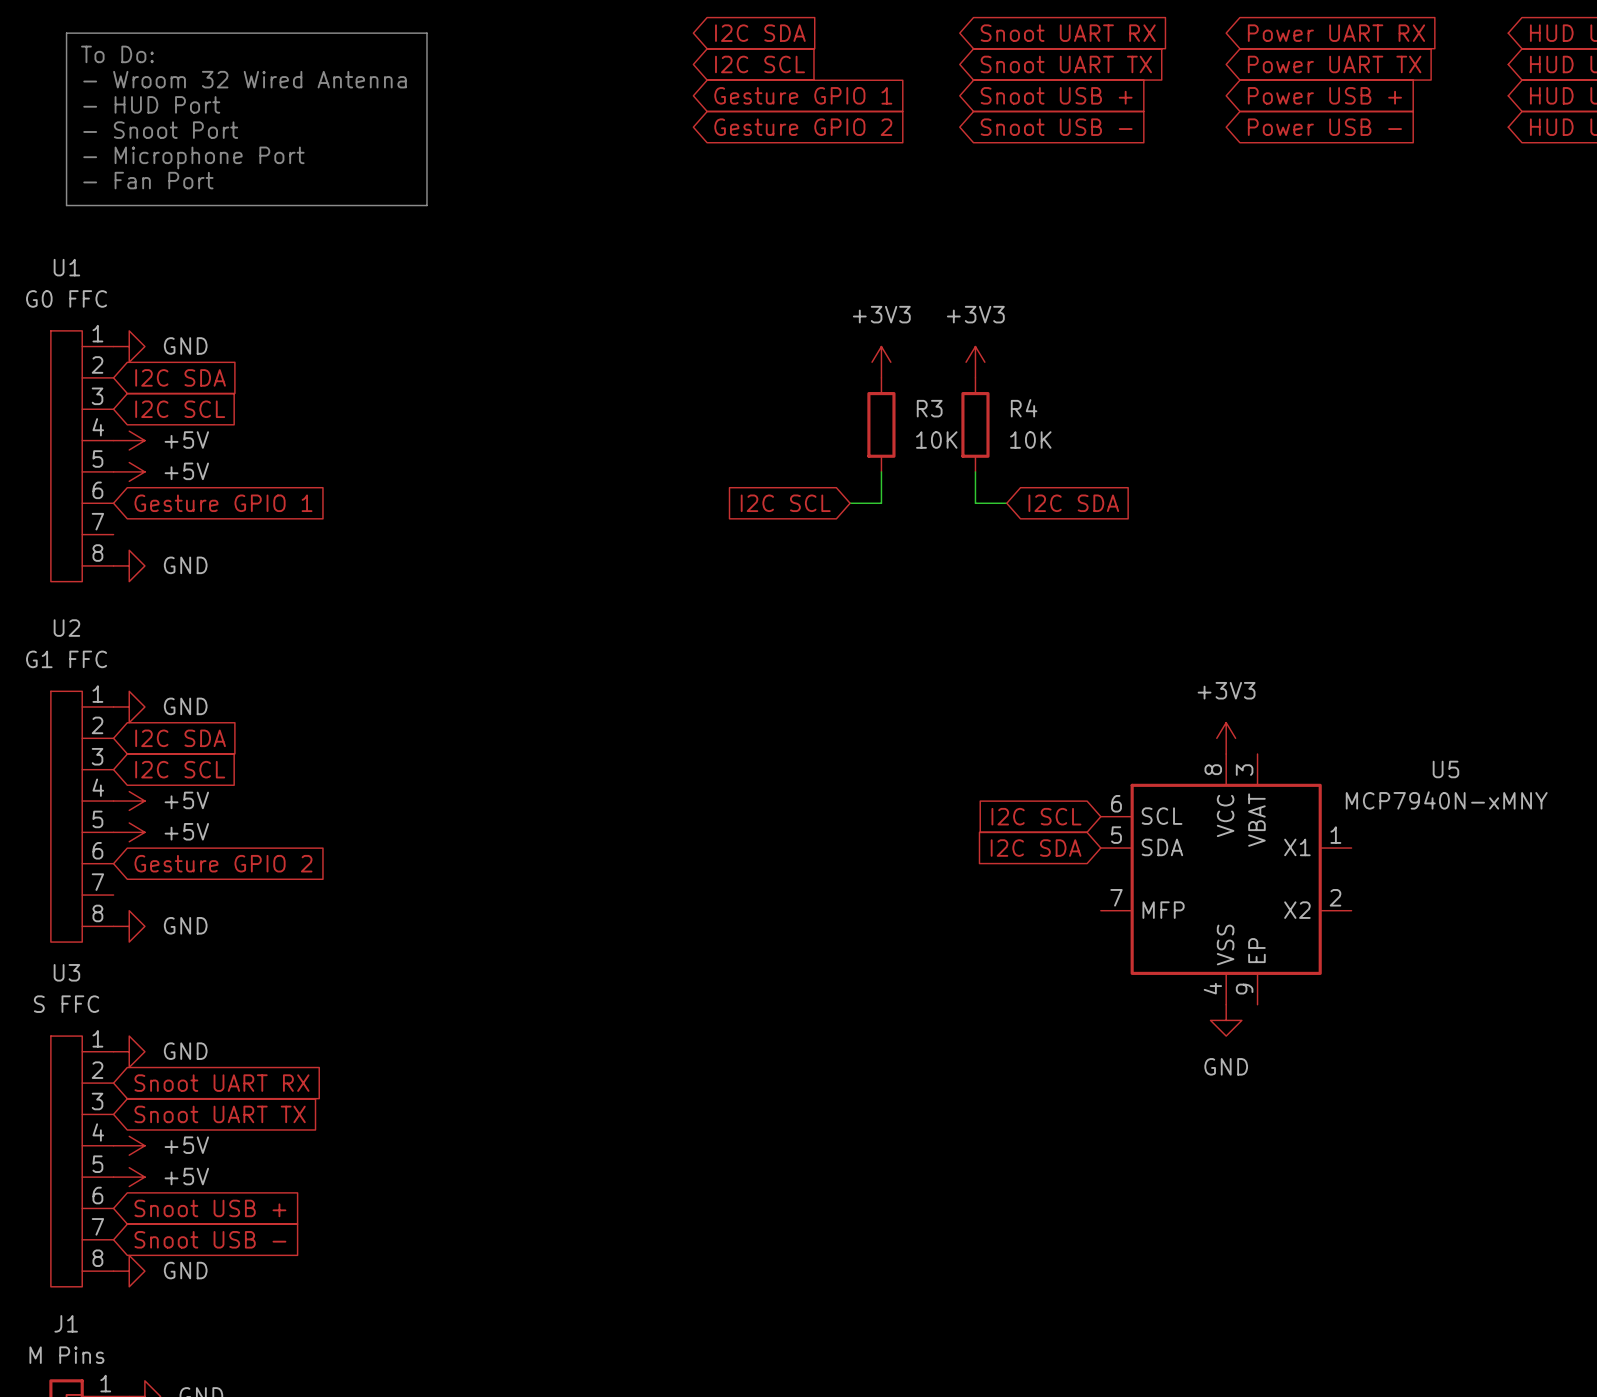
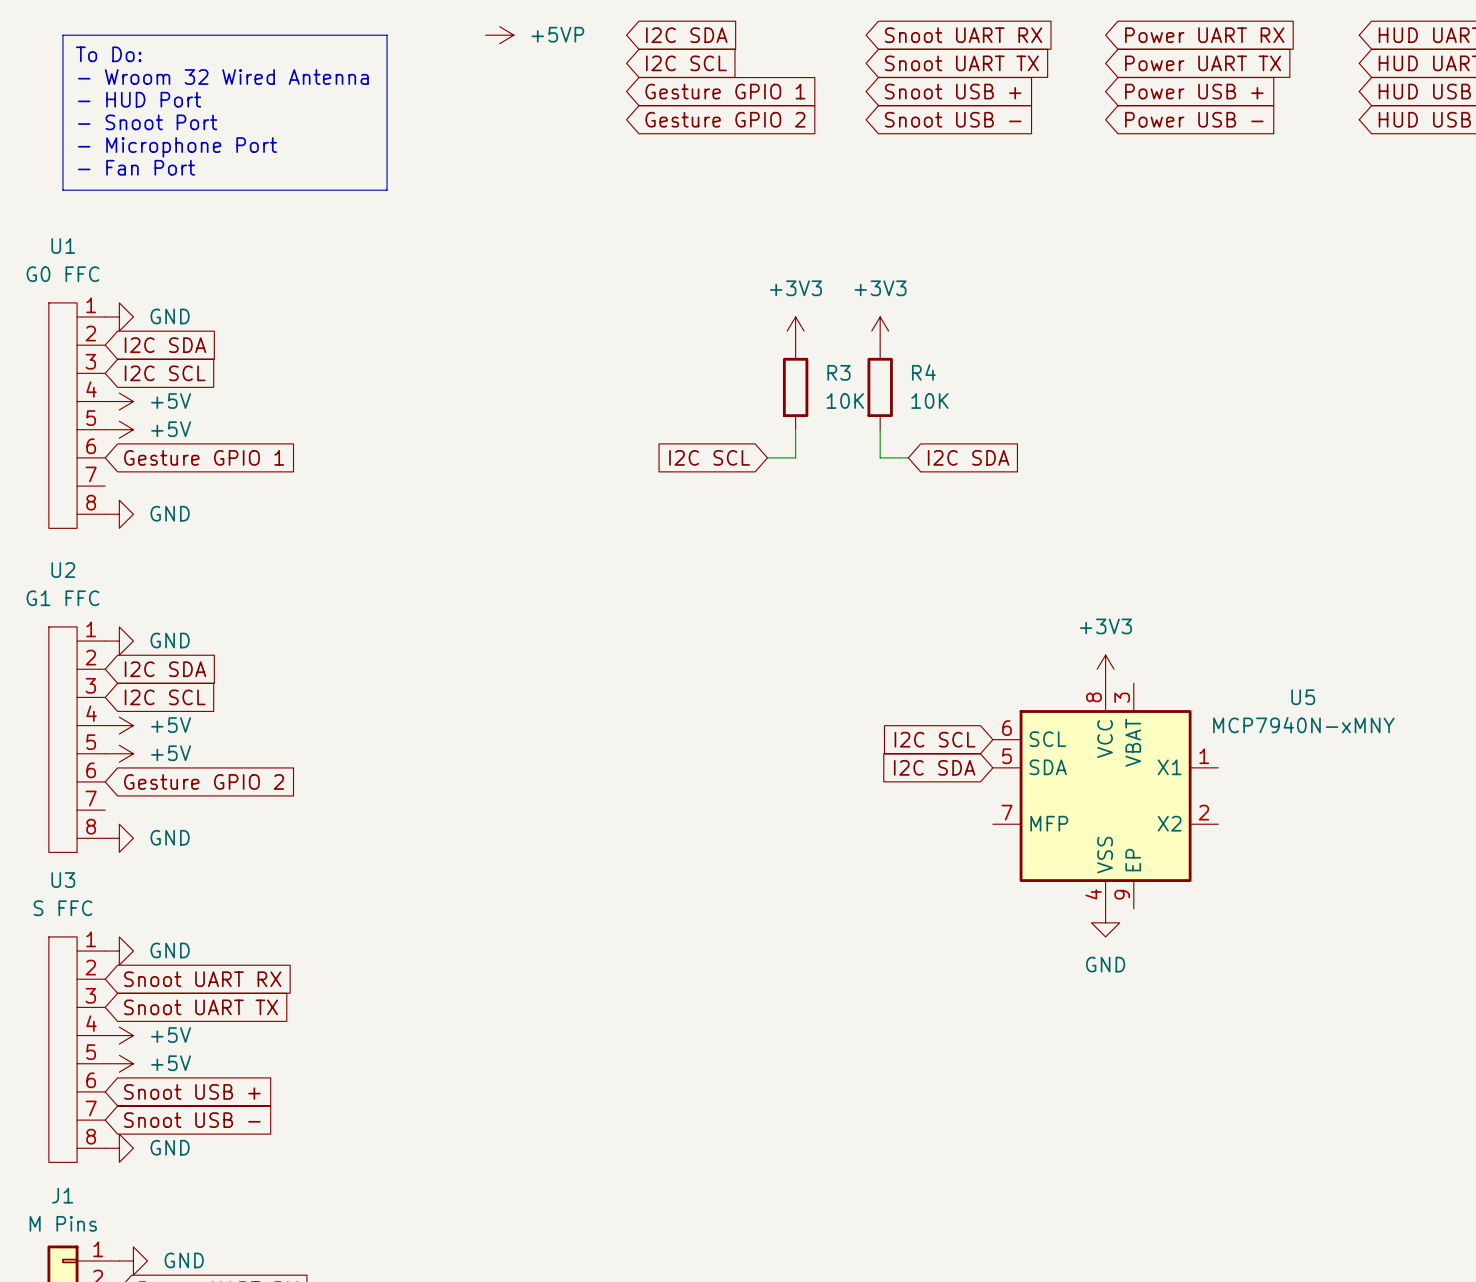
power symbol: none -> +5VP (499, 35)

